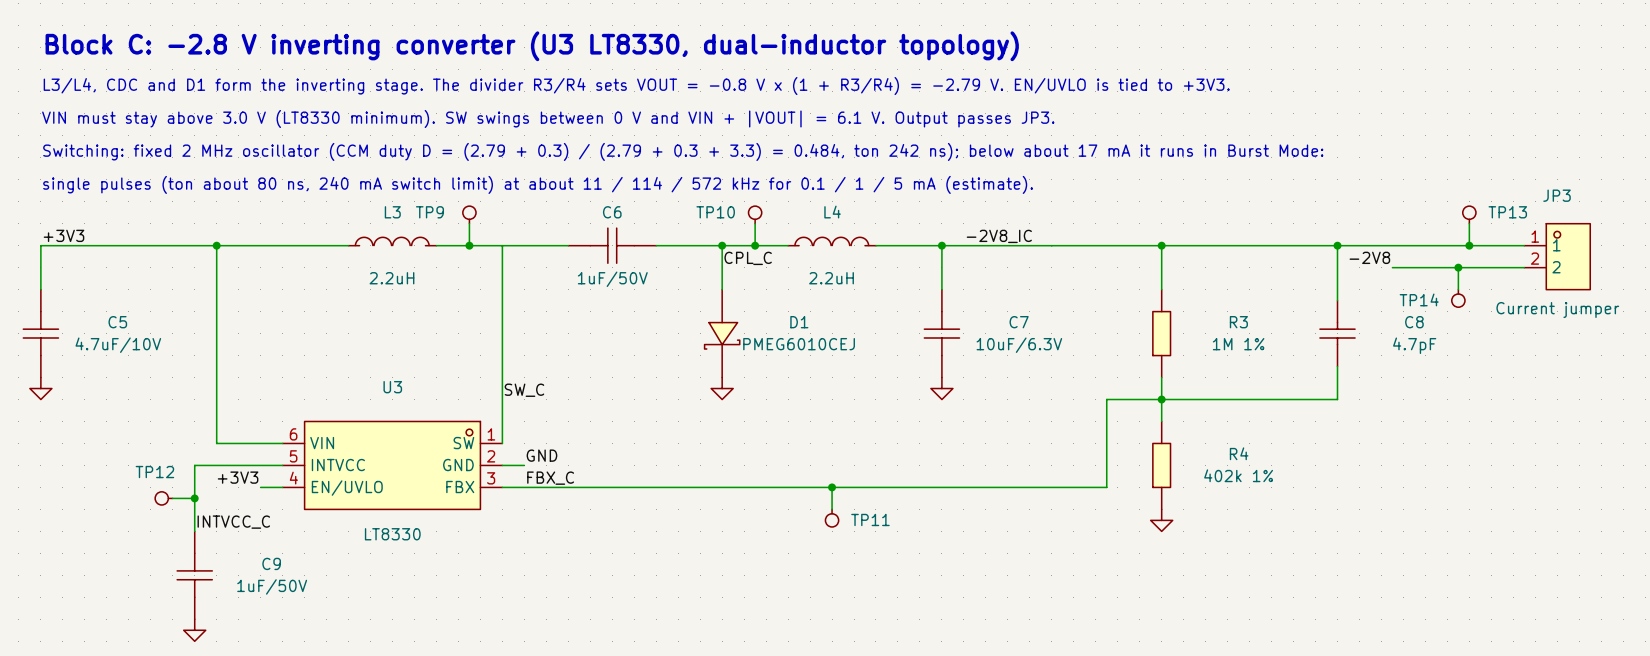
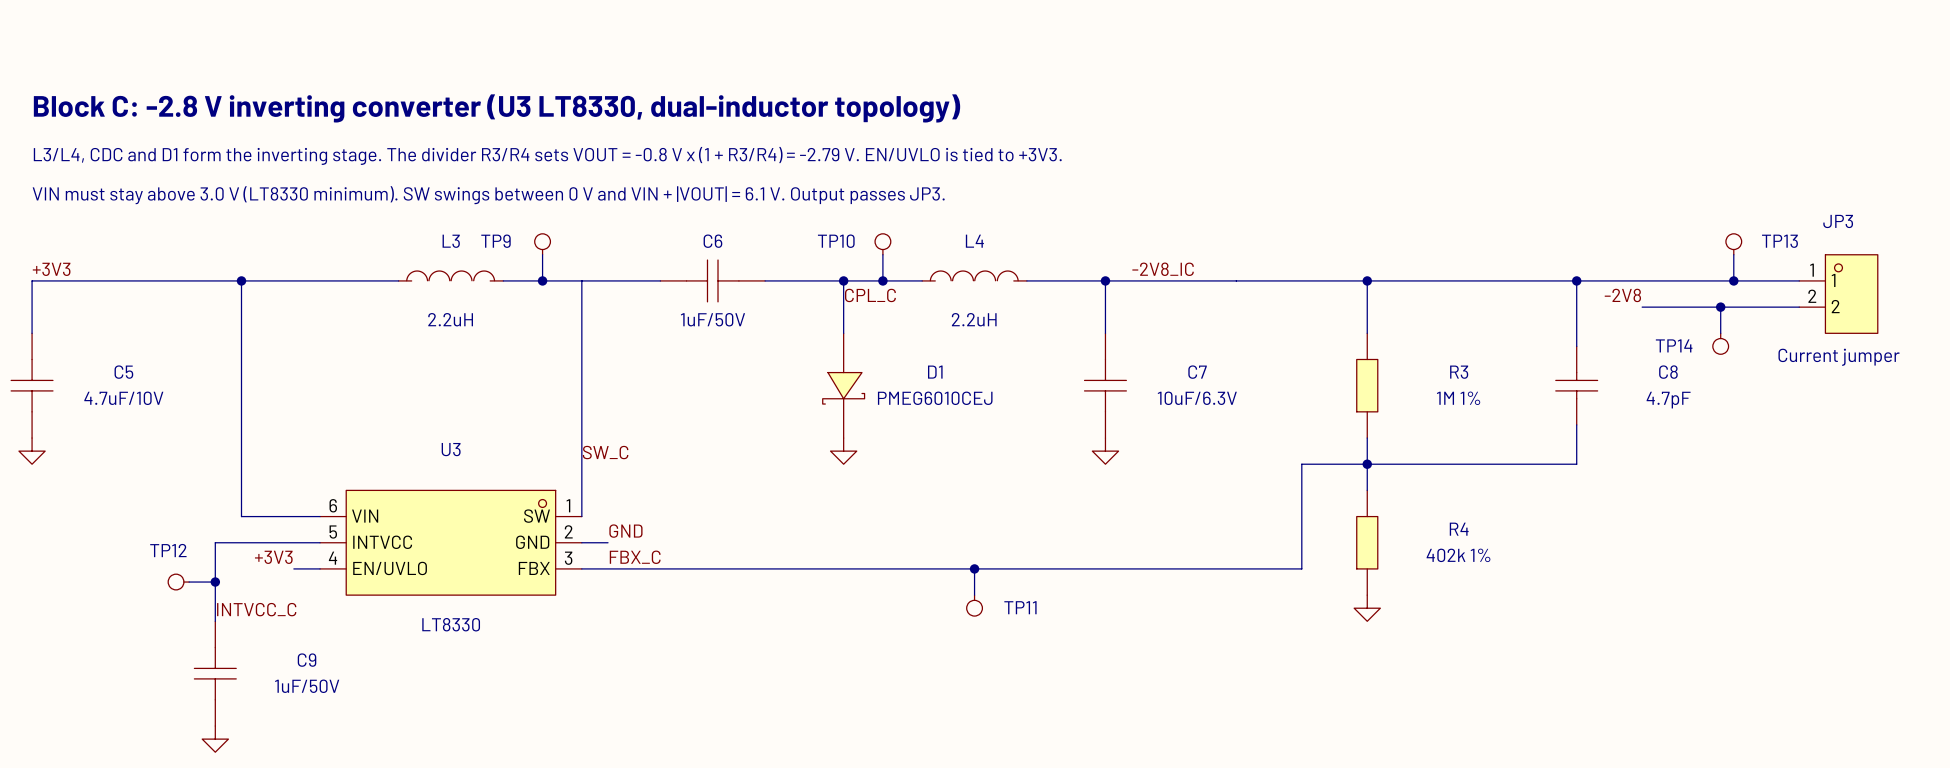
text position: Block C: -2.8 V inverting converter (U3 LT8330, dual-inductor topology) (532, 46) -> Block C: -2.8 V inverting converter (U3 LT8330, dual-inductor topology) (497, 108)
text position: L3/L4, CDC and D1 form the inverting stage. The divider R3/R4 sets VOUT = -0.8 V x (1 + R3/R4) = -2.79 V. EN/UVLO is tied to +3V3. (636, 86) -> L3/L4, CDC and D1 form the inverting stage. The divider R3/R4 sets VOUT = -0.8 V x (1 + R3/R4) = -2.79 V. EN/UVLO is tied to +3V3. (547, 155)
text position: VIN must stay above 3.0 V (LT8330 minimum). SW swings between 0 V and VIN + |VOUT| = 6.1 V. Output passes JP3. (548, 118) -> VIN must stay above 3.0 V (LT8330 minimum). SW swings between 0 V and VIN + |VOUT| = 6.1 V. Output passes JP3. (488, 195)
text: Switching: fixed 2 MHz oscillator (CCM duty D = (2.79 + 0.3) / (2.79 + 0.3 + 3.3) = 0.484, ton 242 ns); below about 17 mA it runs in Burst Mode: (683, 151) -> none
text: single pulses (ton about 80 ns, 240 mA switch limit) at about 11 / 114 / 572 kHz for 0.1 / 1 / 5 mA (estimate). (538, 184) -> none

